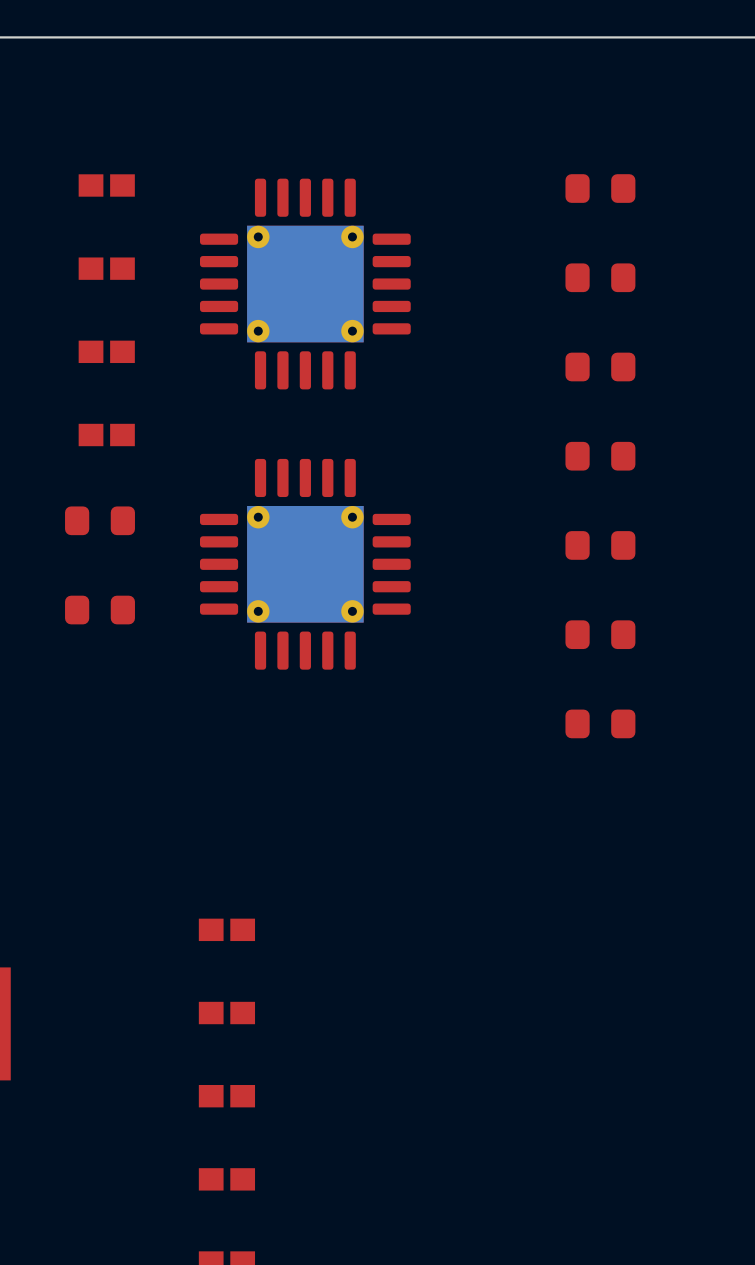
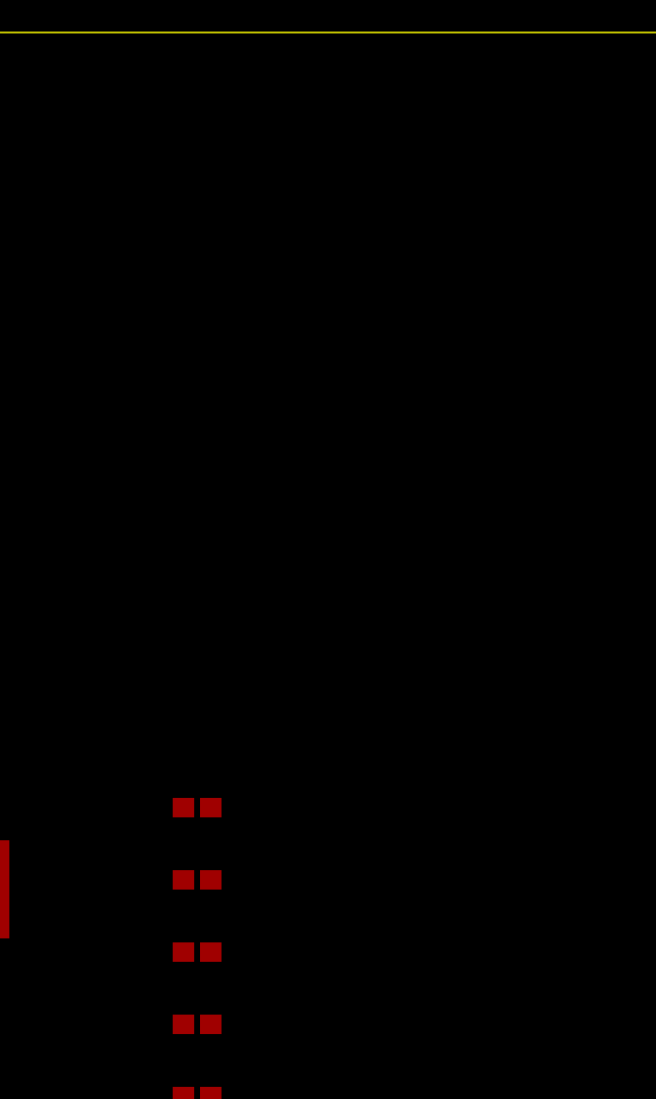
part: (106, 185) -> none
part: (600, 188) -> none
part: (106, 268) -> none
part: (600, 277) -> none
part: (305, 284) -> none
part: (106, 351) -> none
part: (600, 366) -> none
part: (106, 435) -> none
part: (600, 456) -> none
part: (100, 520) -> none
part: (600, 545) -> none
part: (305, 564) -> none
part: (100, 610) -> none
part: (600, 634) -> none
part: (600, 723) -> none

